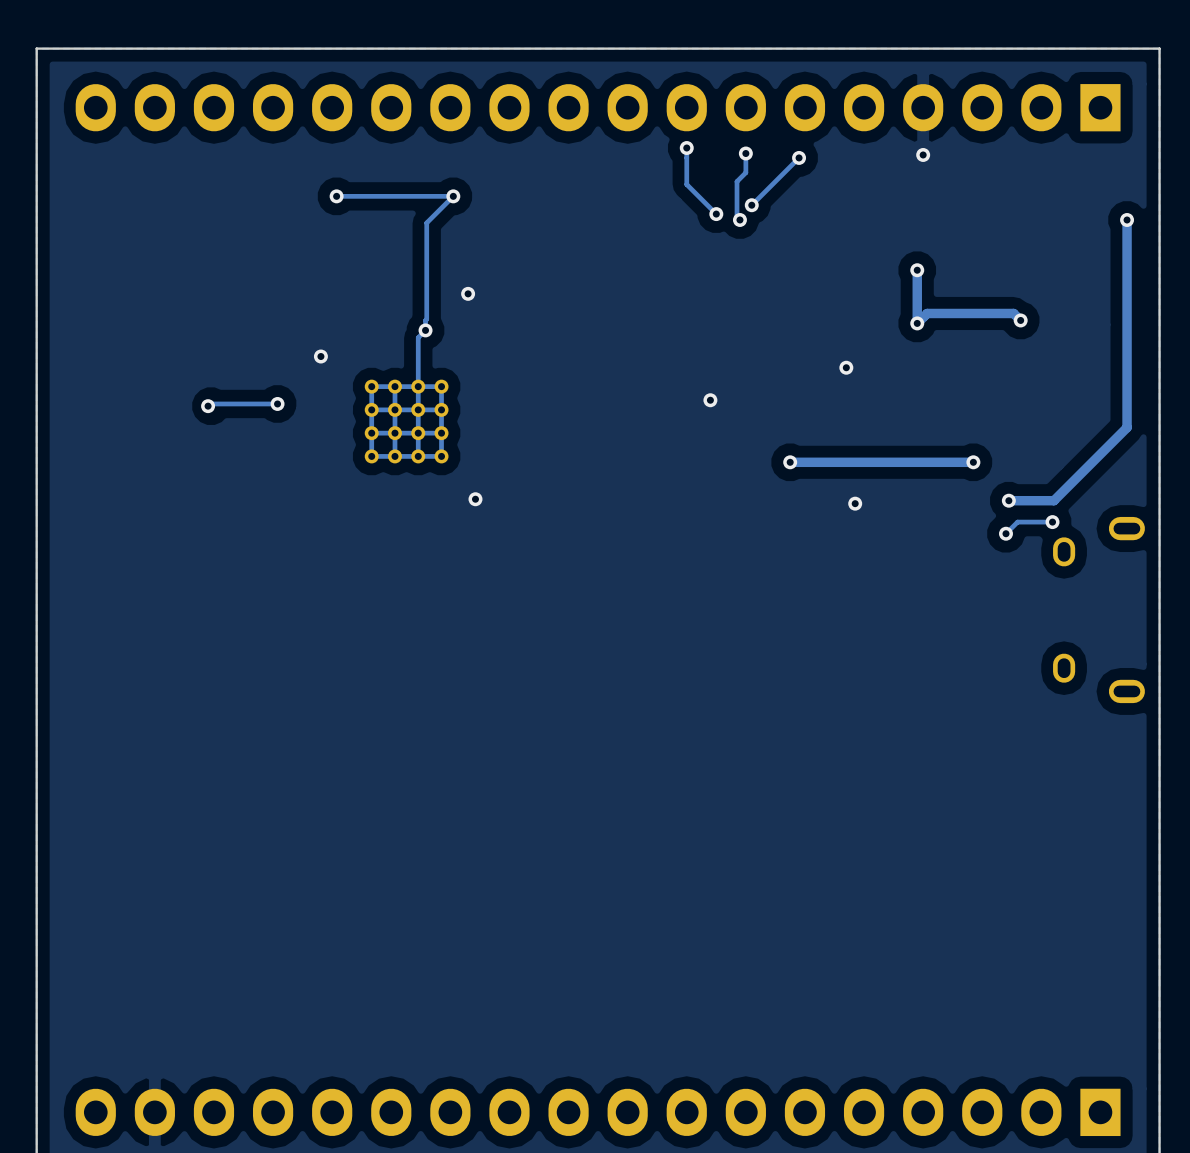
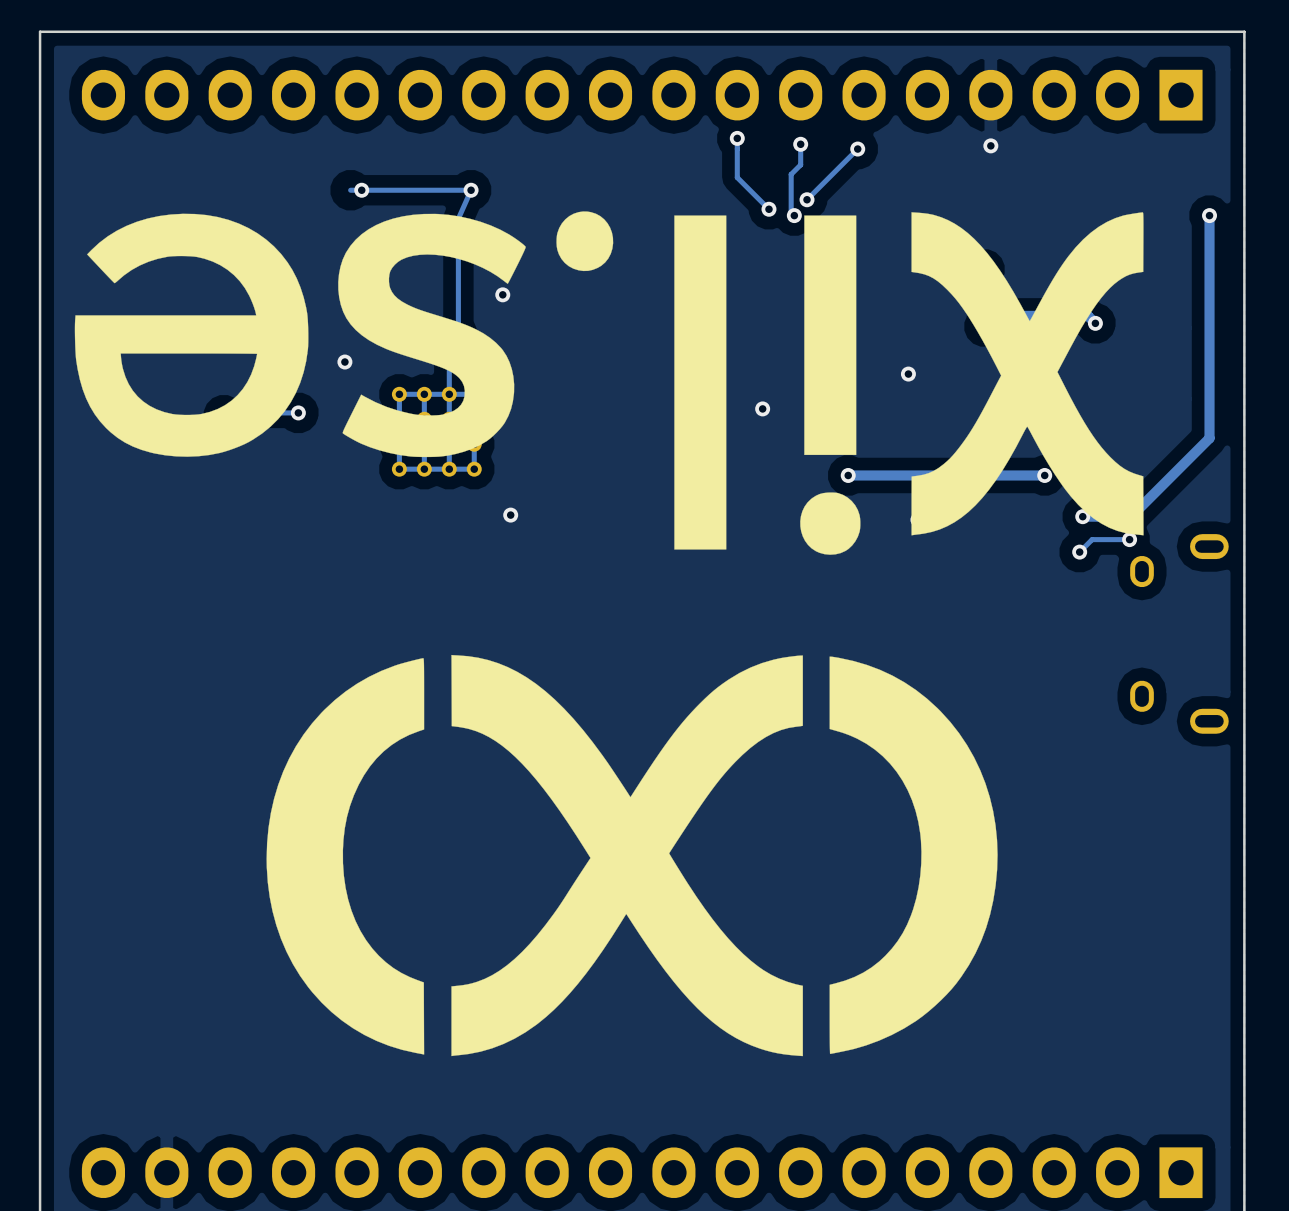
track: none -> (361, 190) (350, 190)
track: (438, 196) (453, 196) (426, 222) -> (471, 190) (458, 218)
via position: (453, 196) -> (471, 190)
drawing: none -> [74, 211, 1144, 1057]

